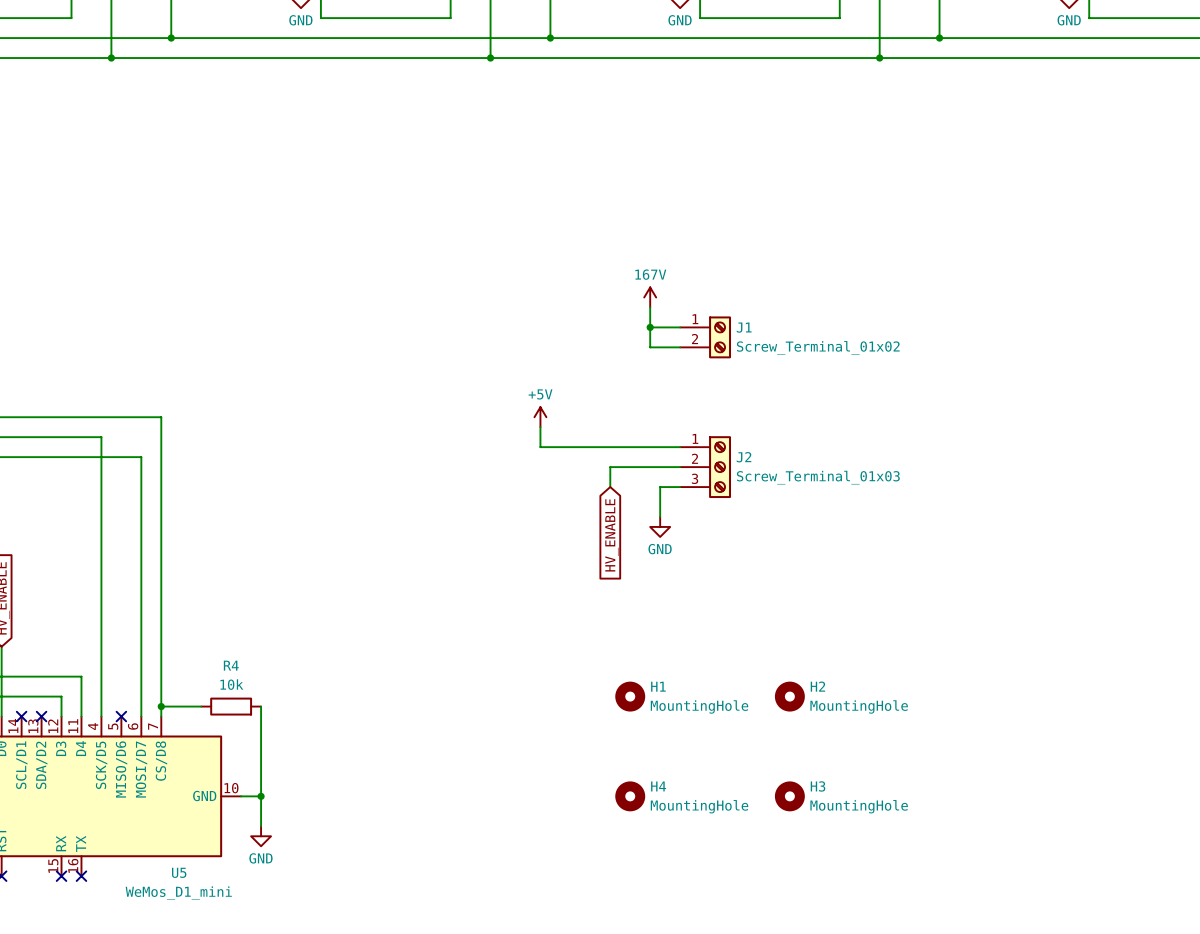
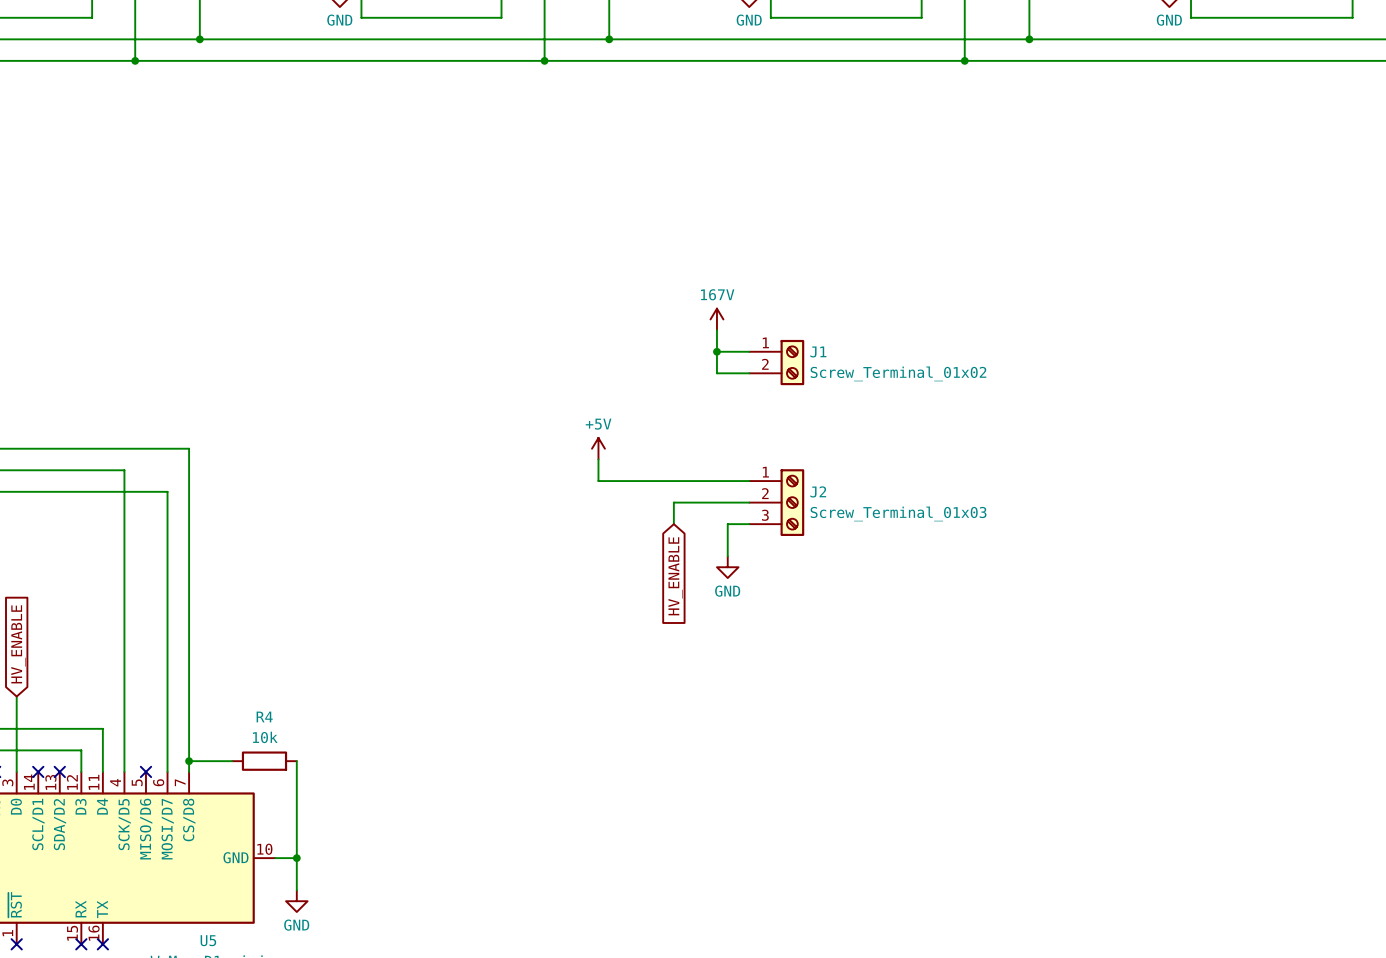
H1: MountingHole (630, 696) -> none
H2: MountingHole (789, 696) -> none
H4: MountingHole (630, 796) -> none
H3: MountingHole (789, 796) -> none

